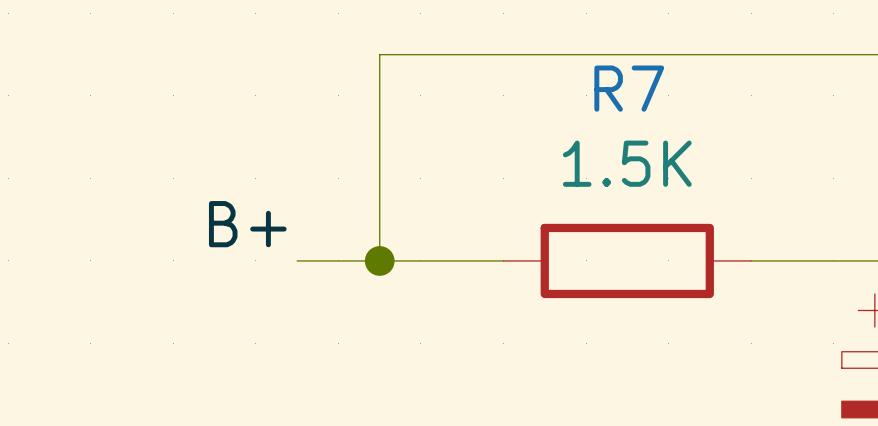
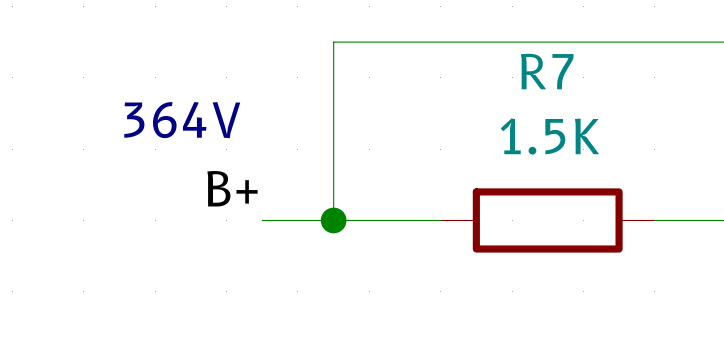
text: none -> 364V (182, 120)

